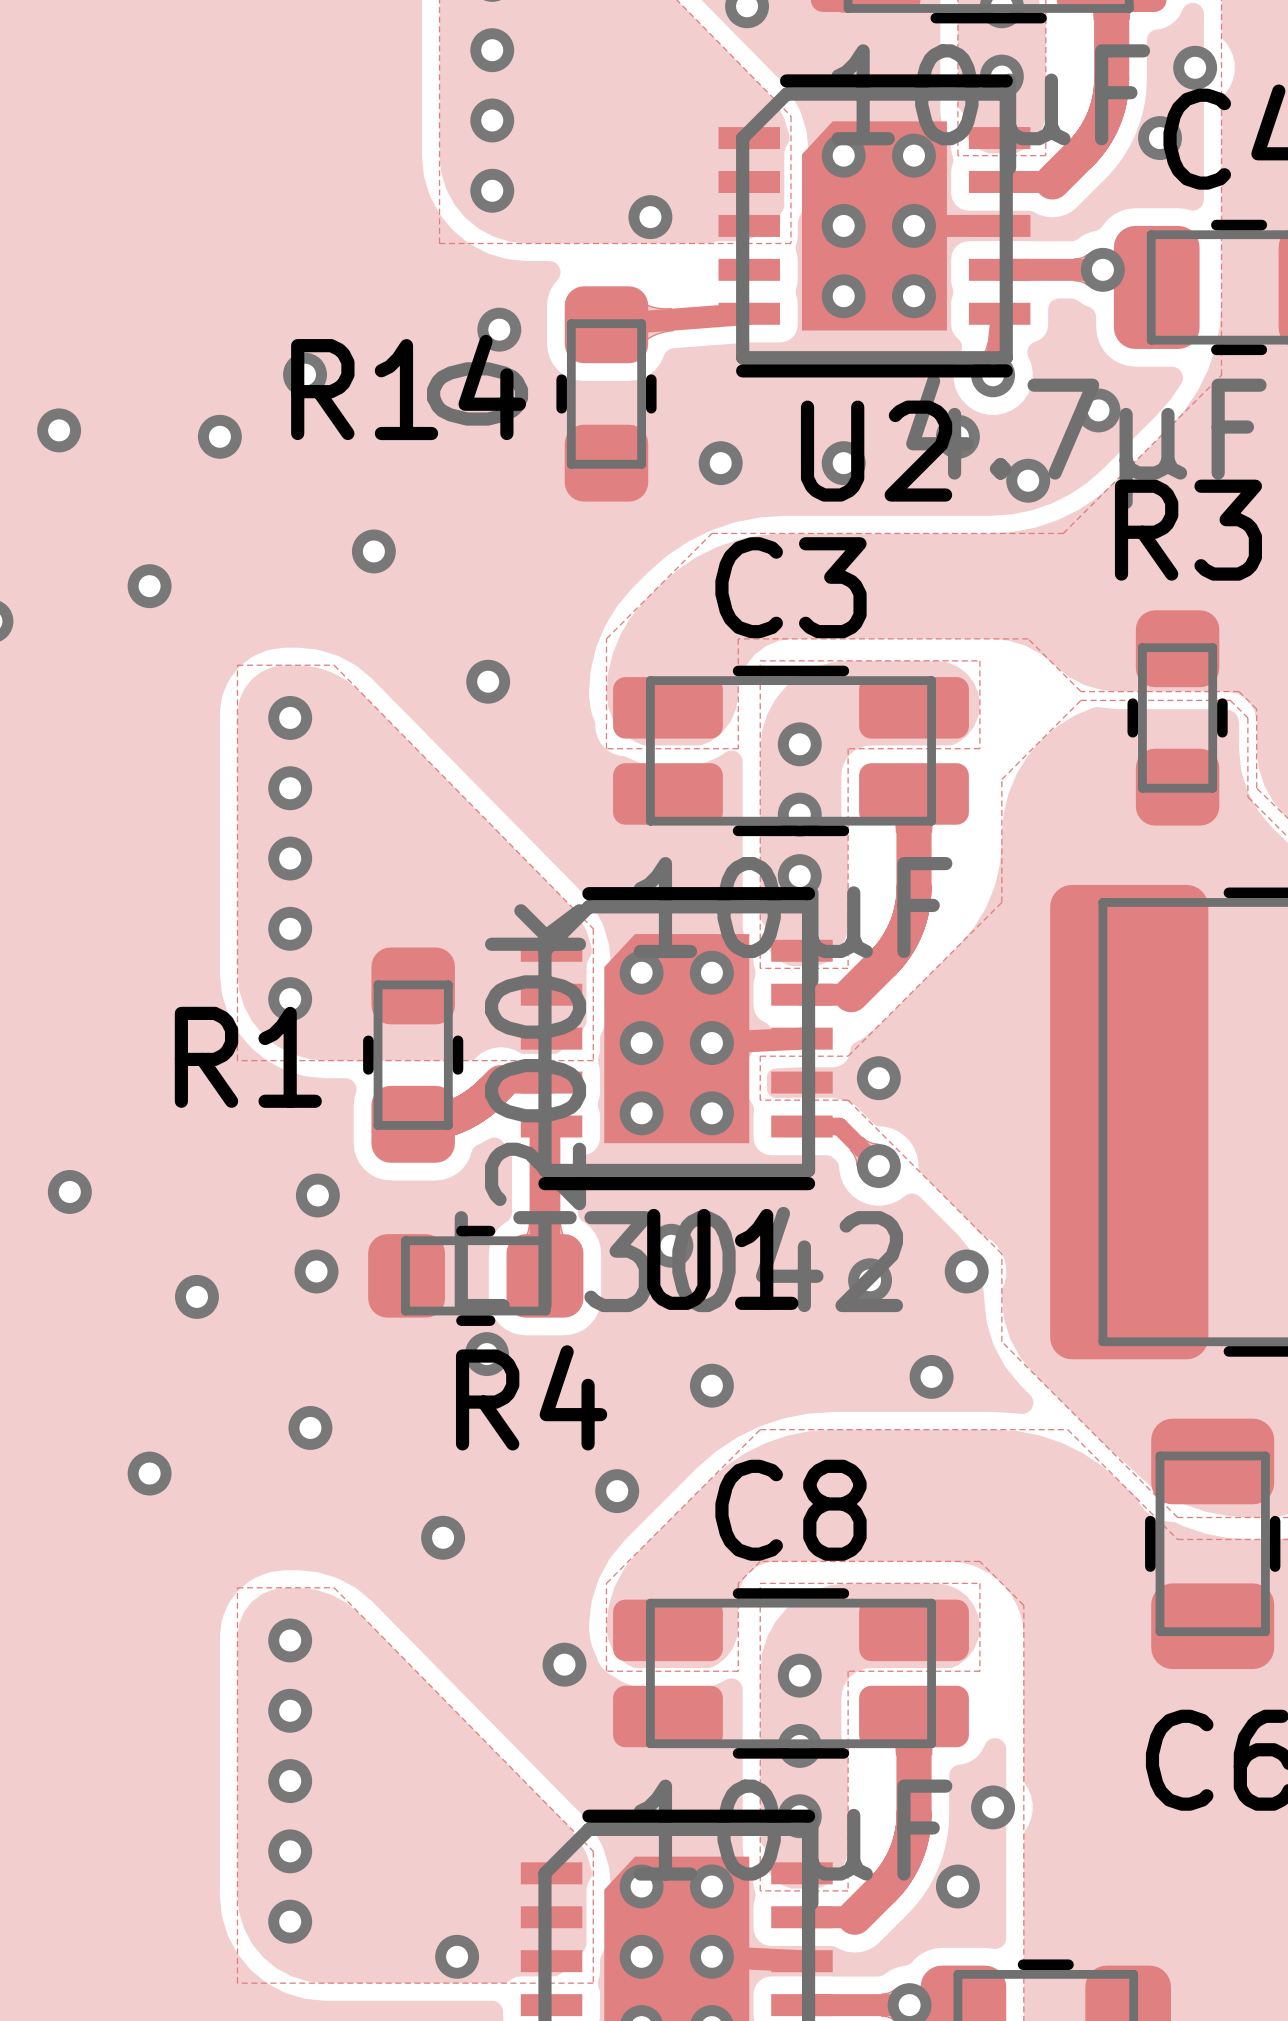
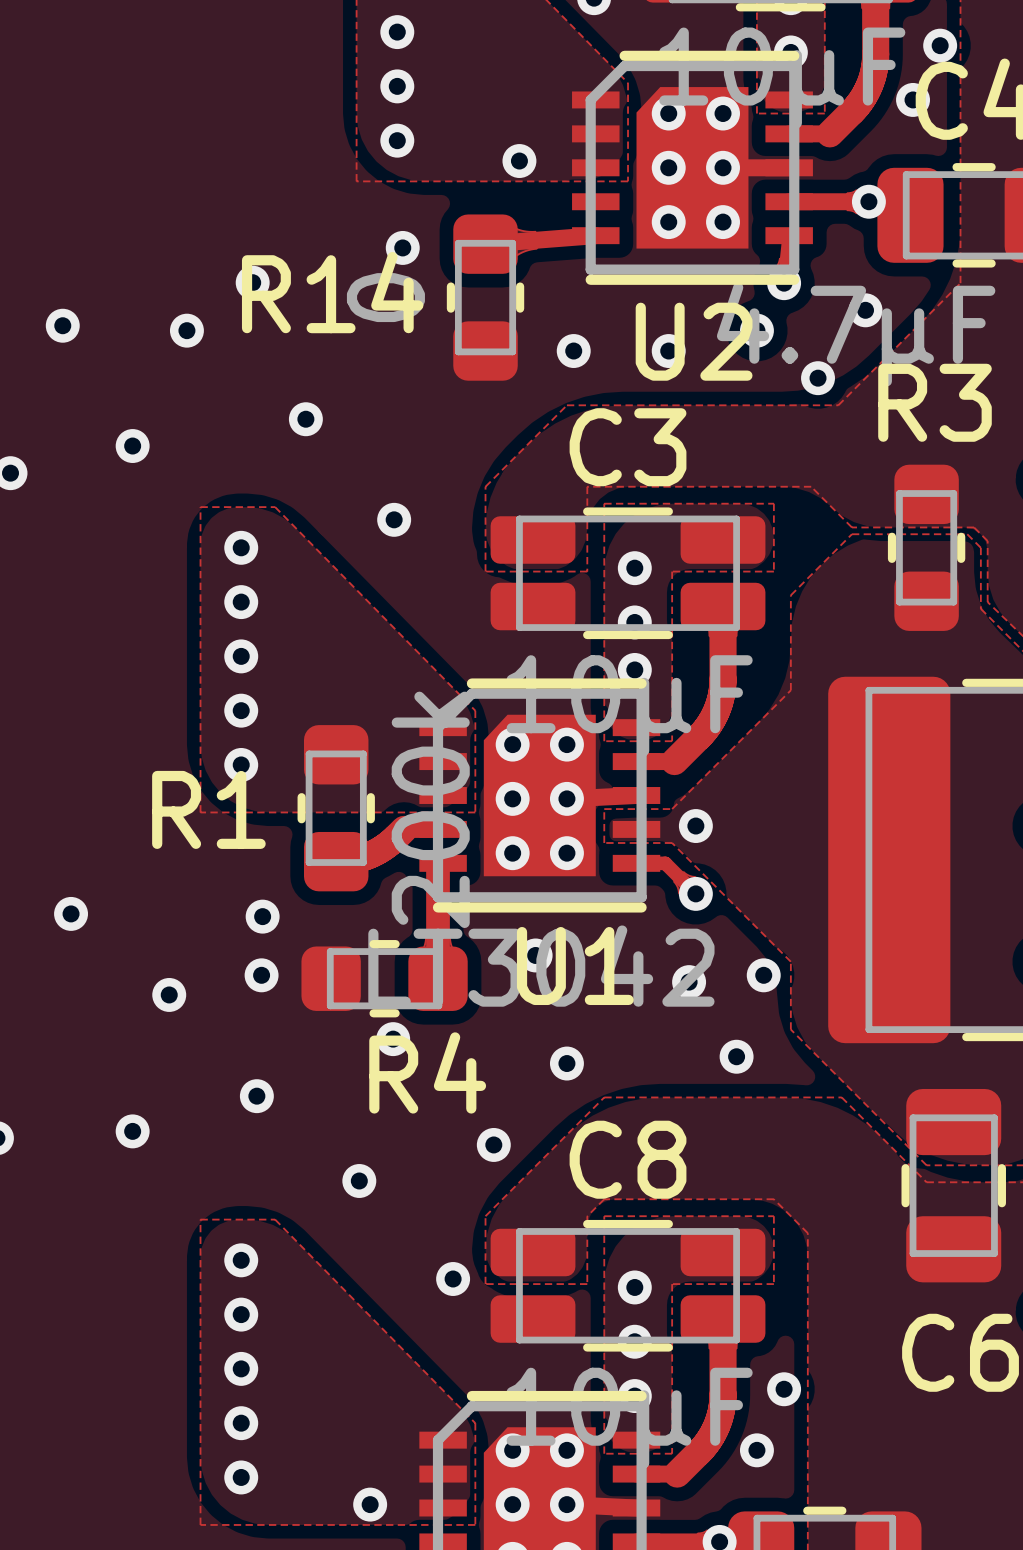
via position: (1028, 480) -> (818, 378)

